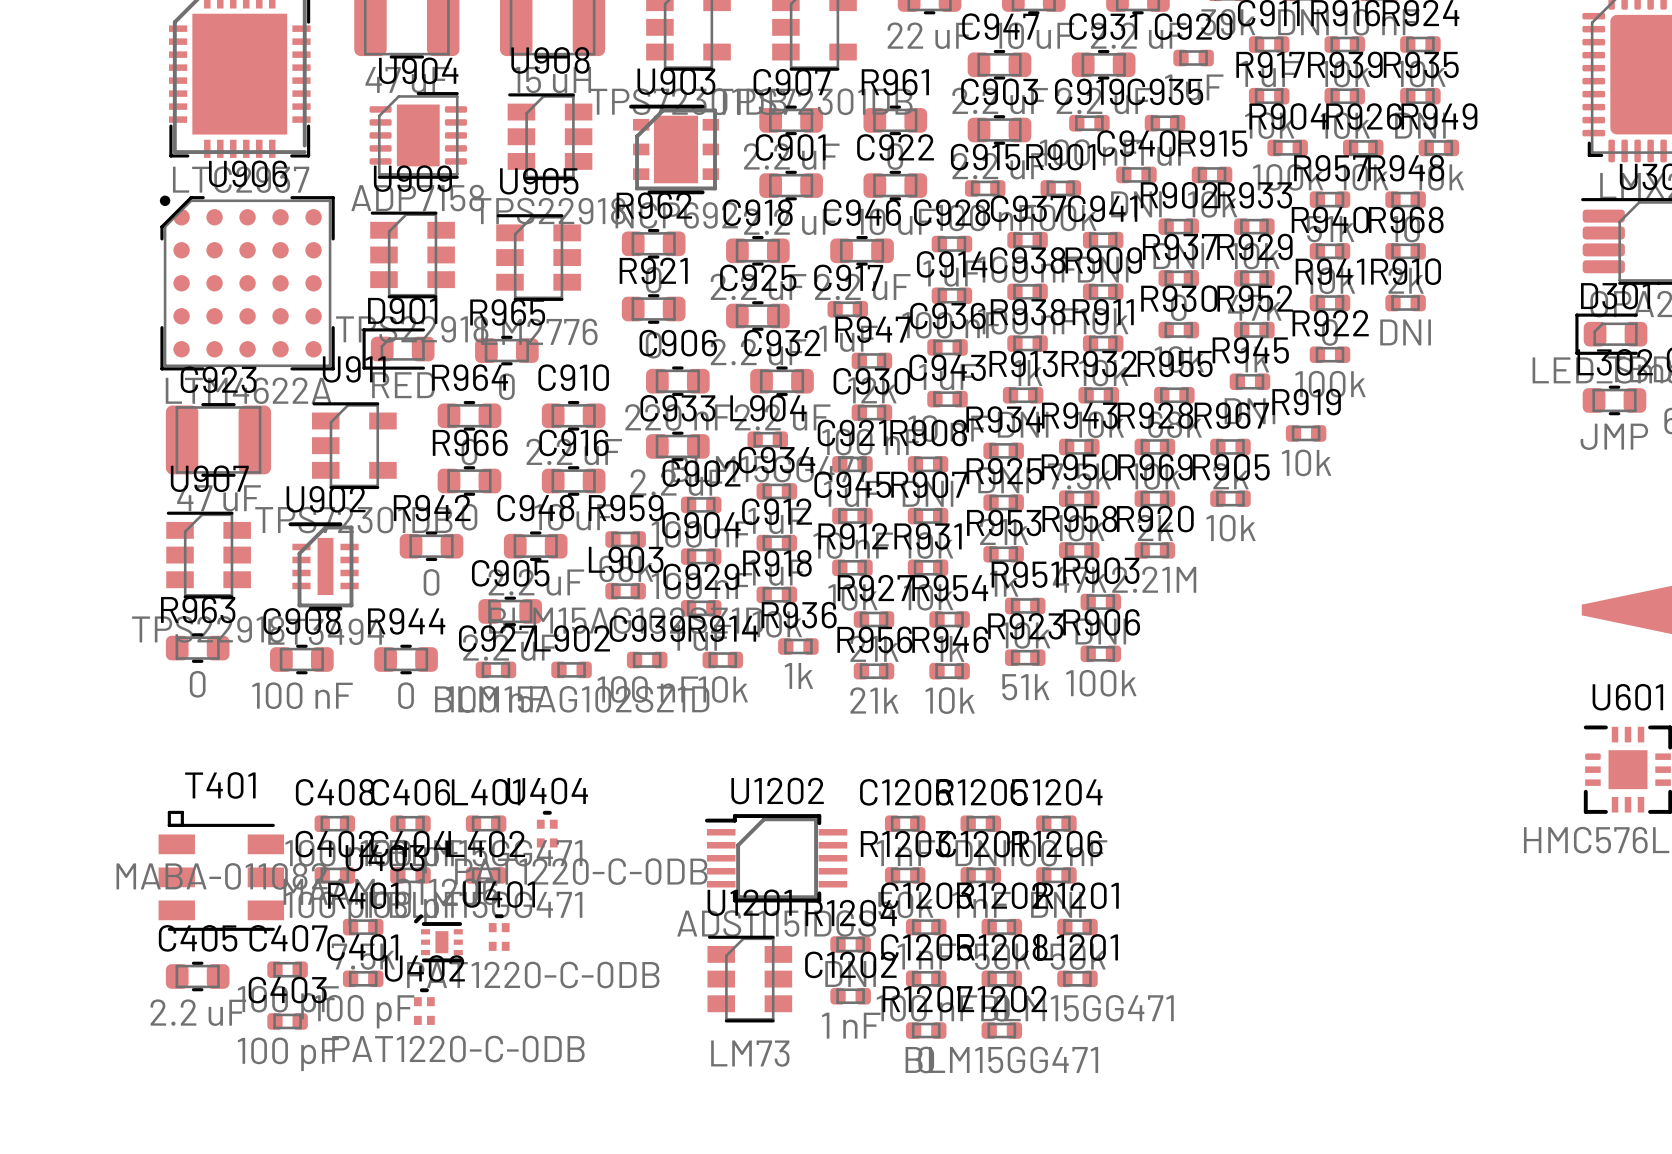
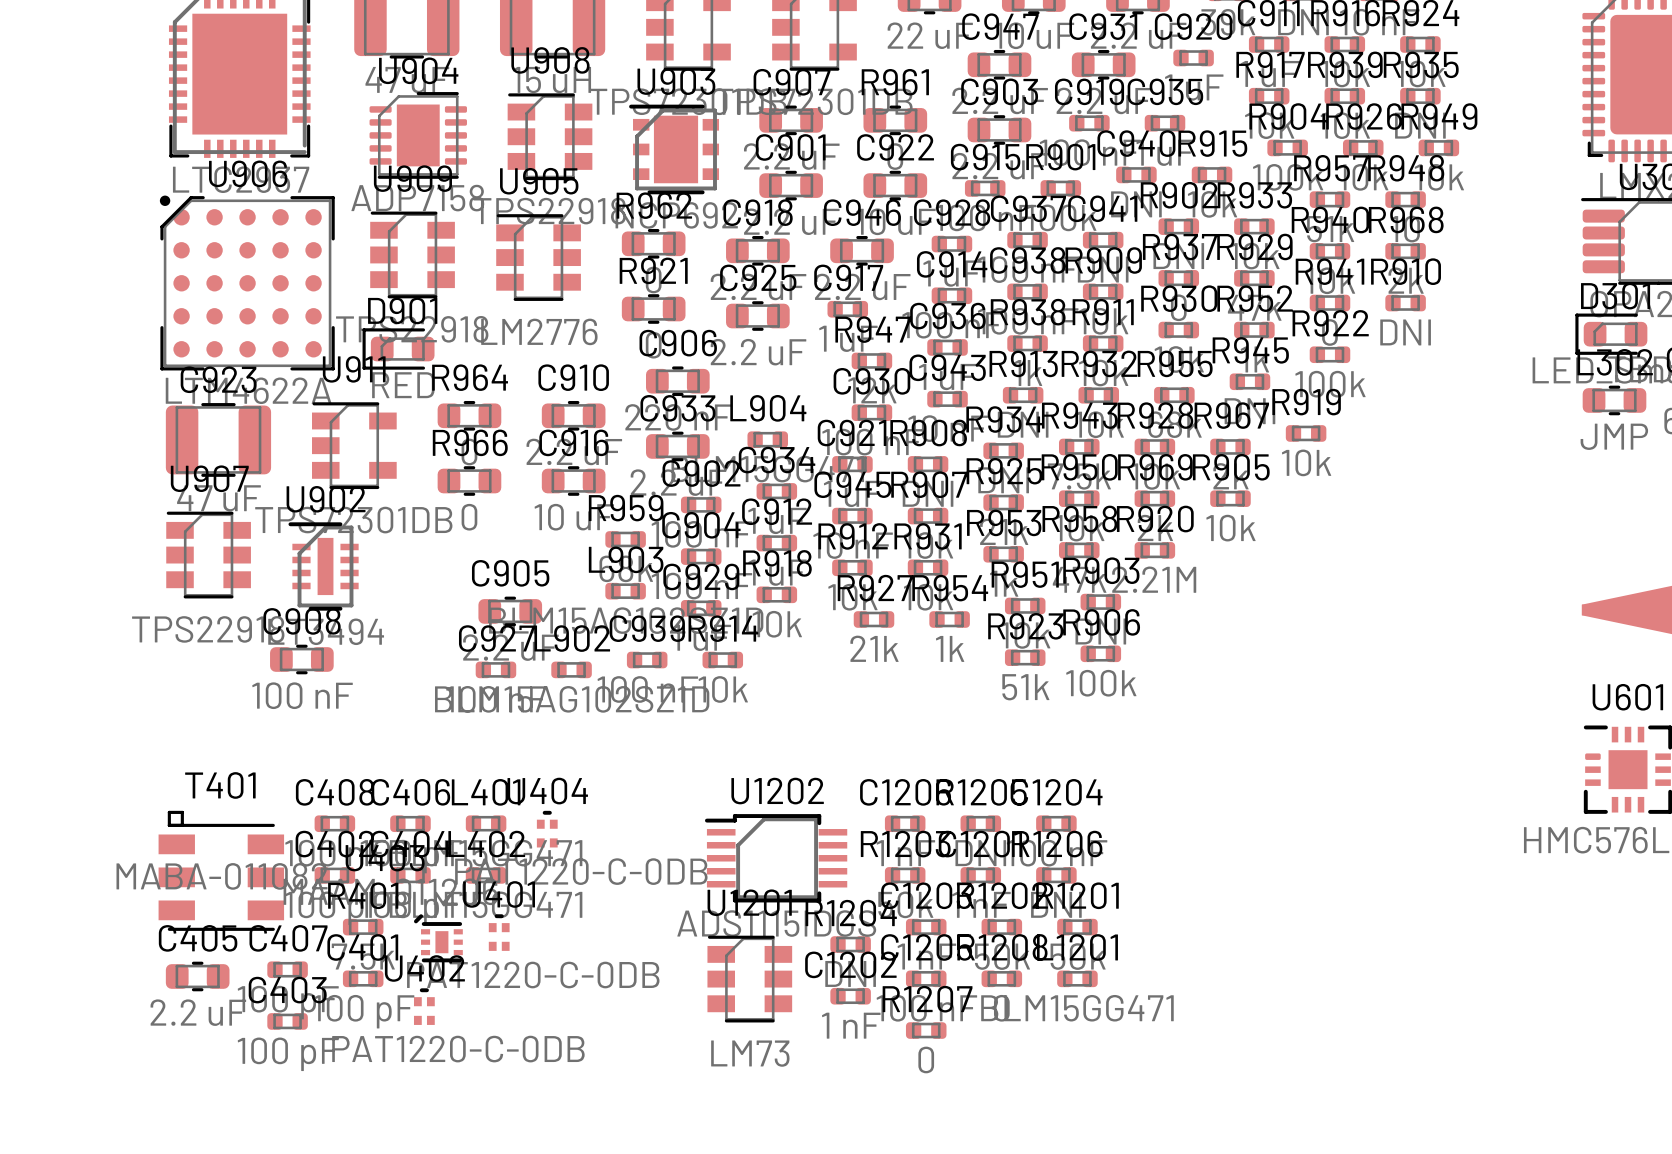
R965: 0 (506, 350) -> none
C932: 2.2 uF (782, 381) -> none
R942: 0 (431, 546) -> none
C948: 2.2 uF (535, 546) -> none
R936: 1k (798, 646) -> none
R963: 0 (197, 648) -> none
R944: 0 (406, 659) -> none
R956: 21k (874, 671) -> none
R946: 10k (949, 671) -> none
L1202: BLM15GG471 (1001, 1030) -> none

